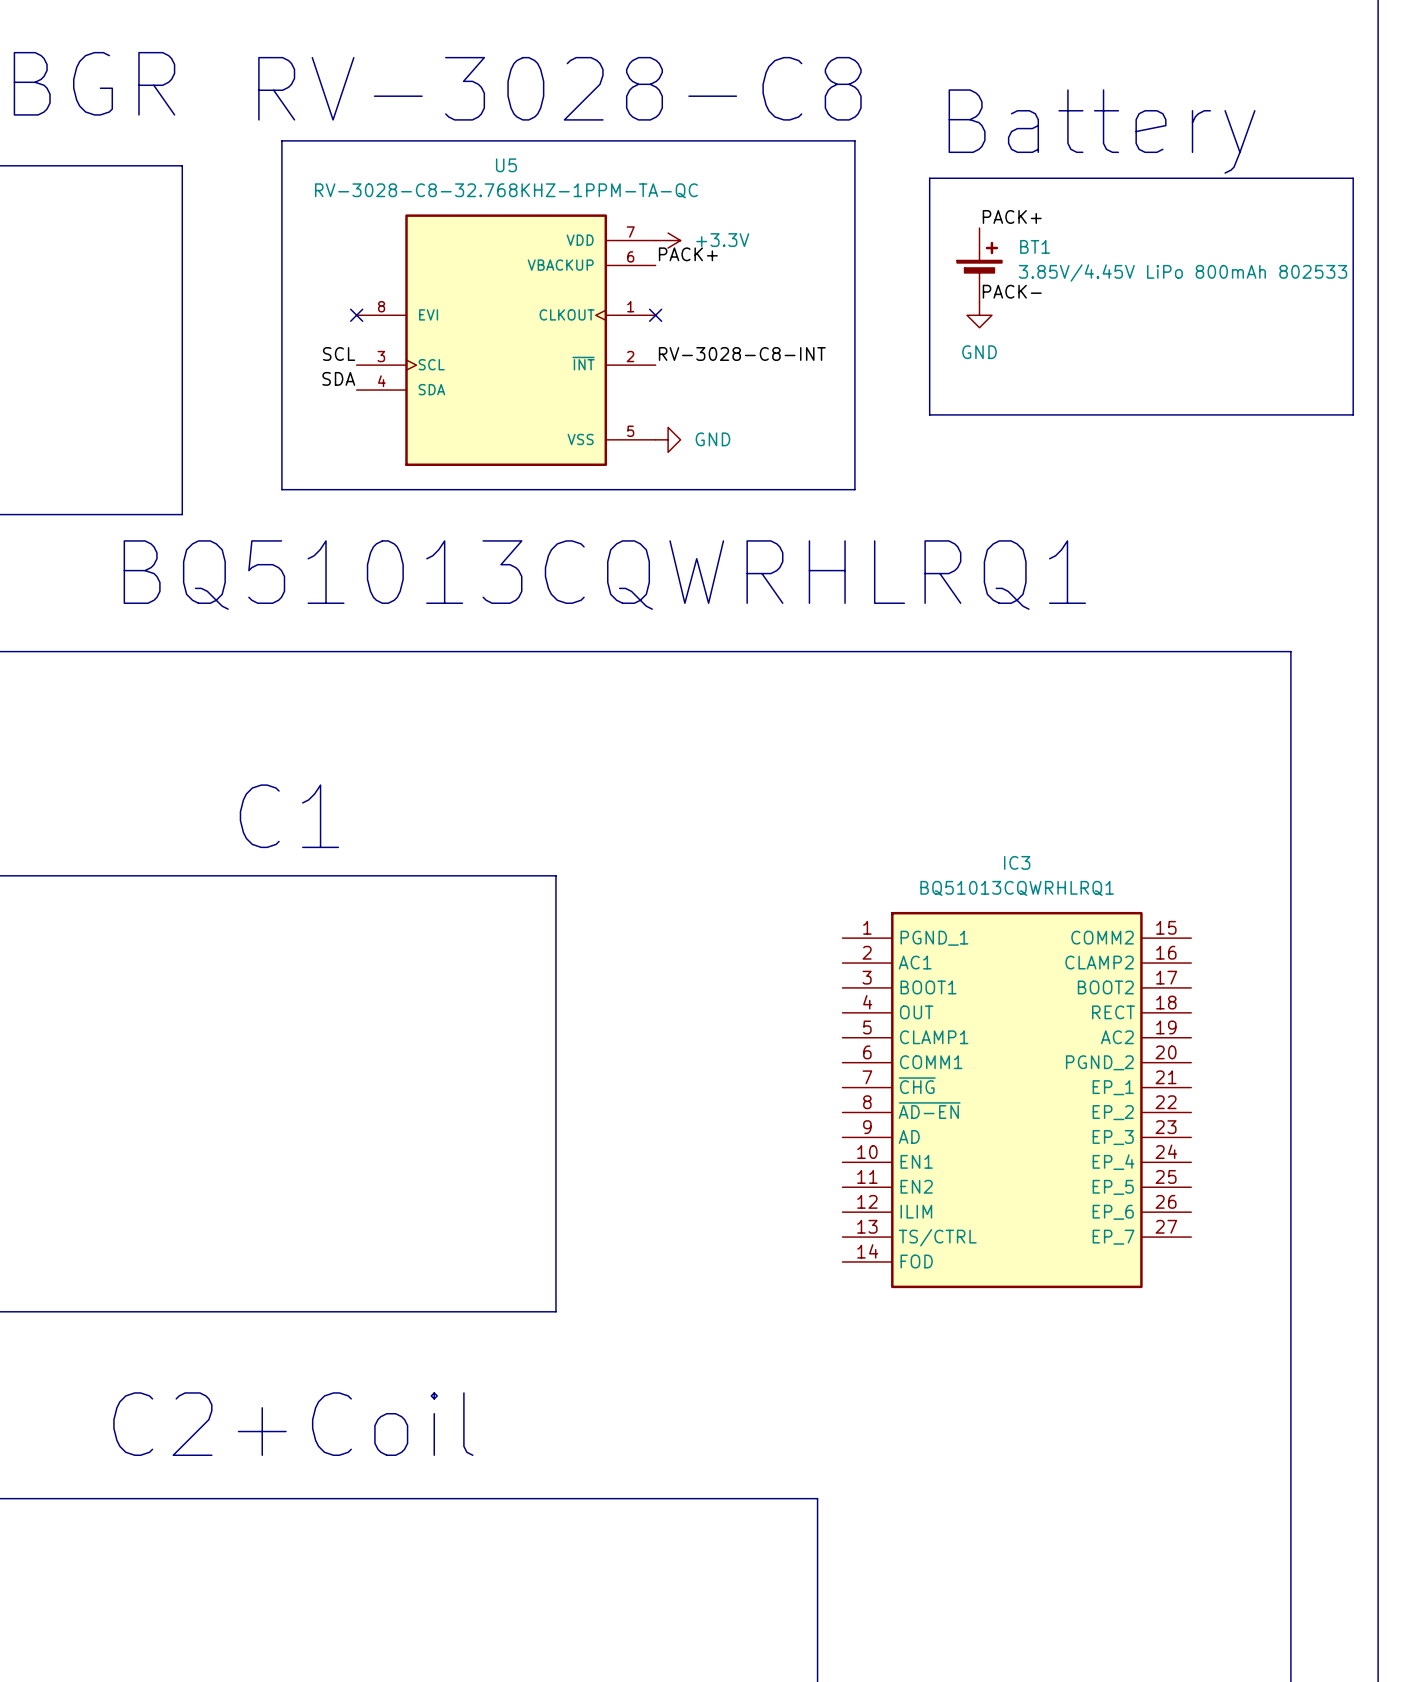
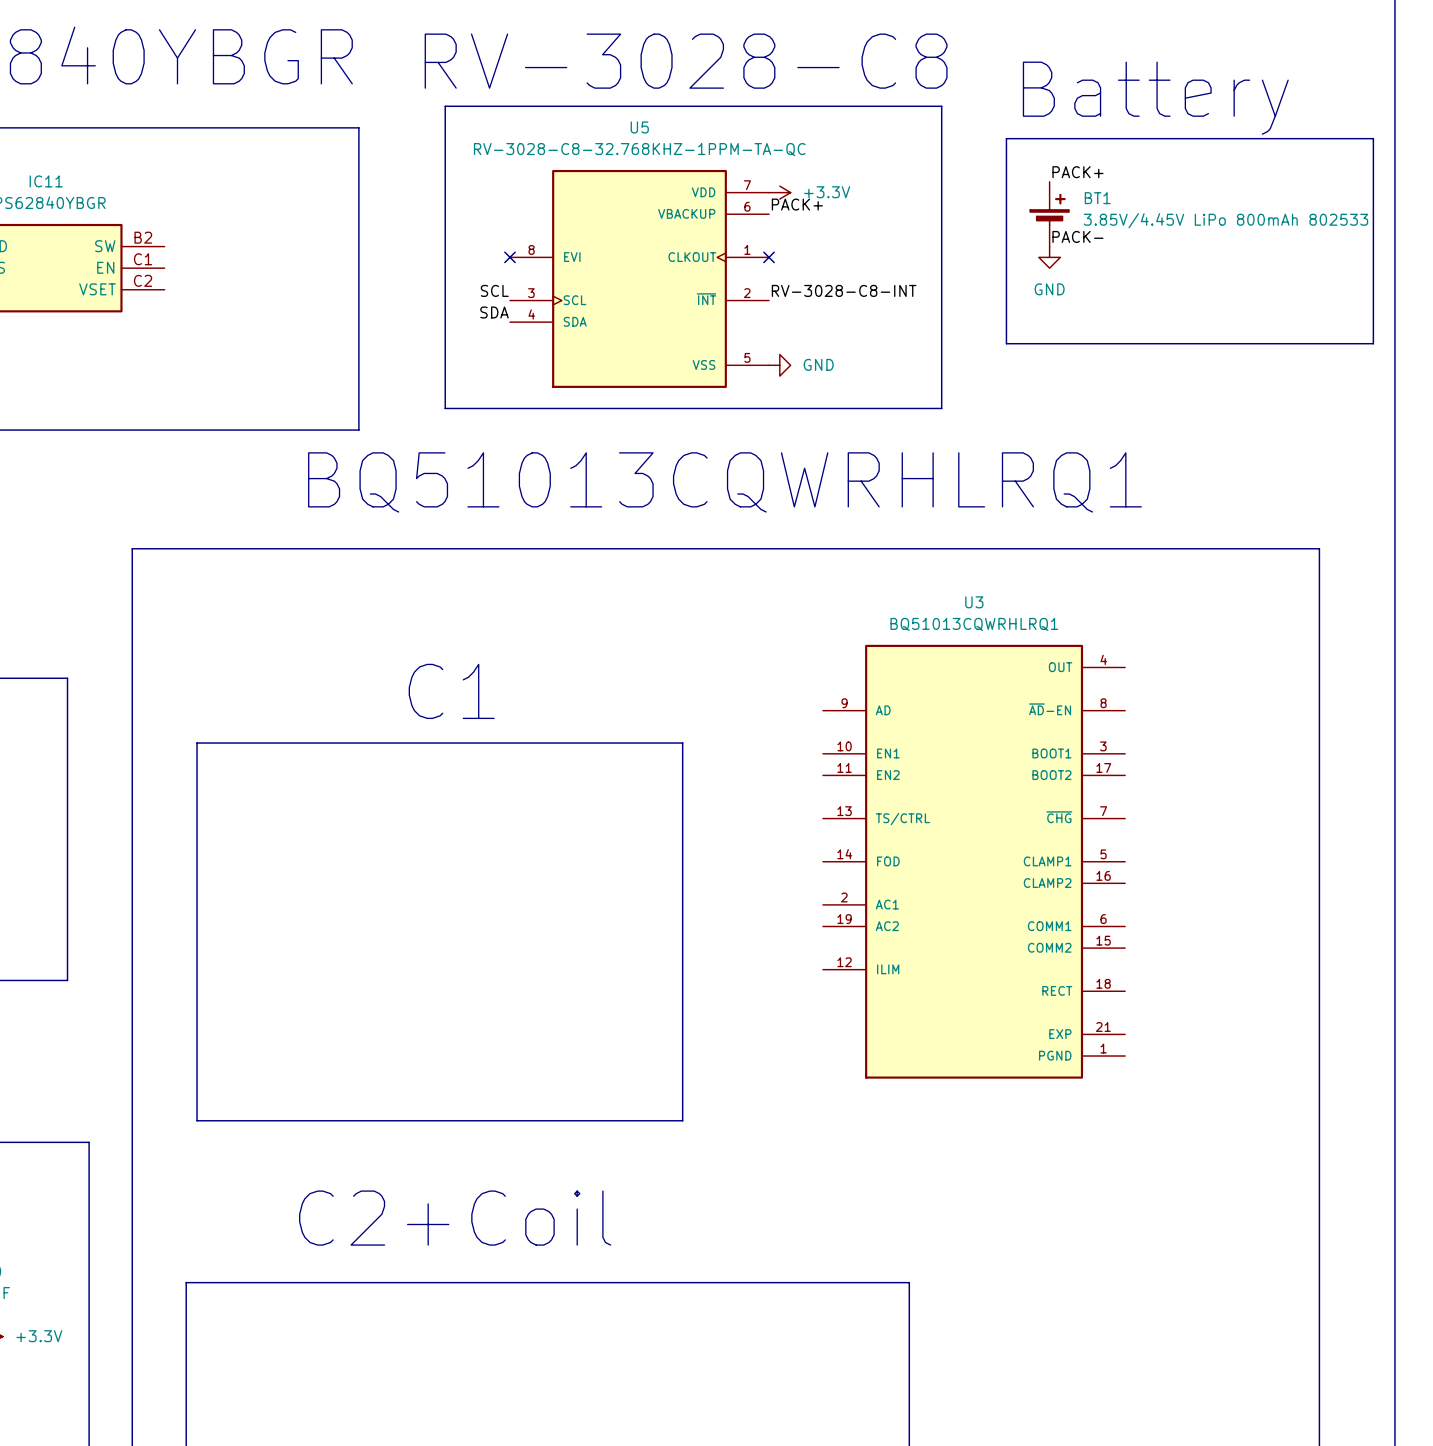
U3: none -> BQ51013CQWRHLRQ1 (974, 861)
IC3: BQ51013CQWRHLRQ1 (1016, 1100) -> none

